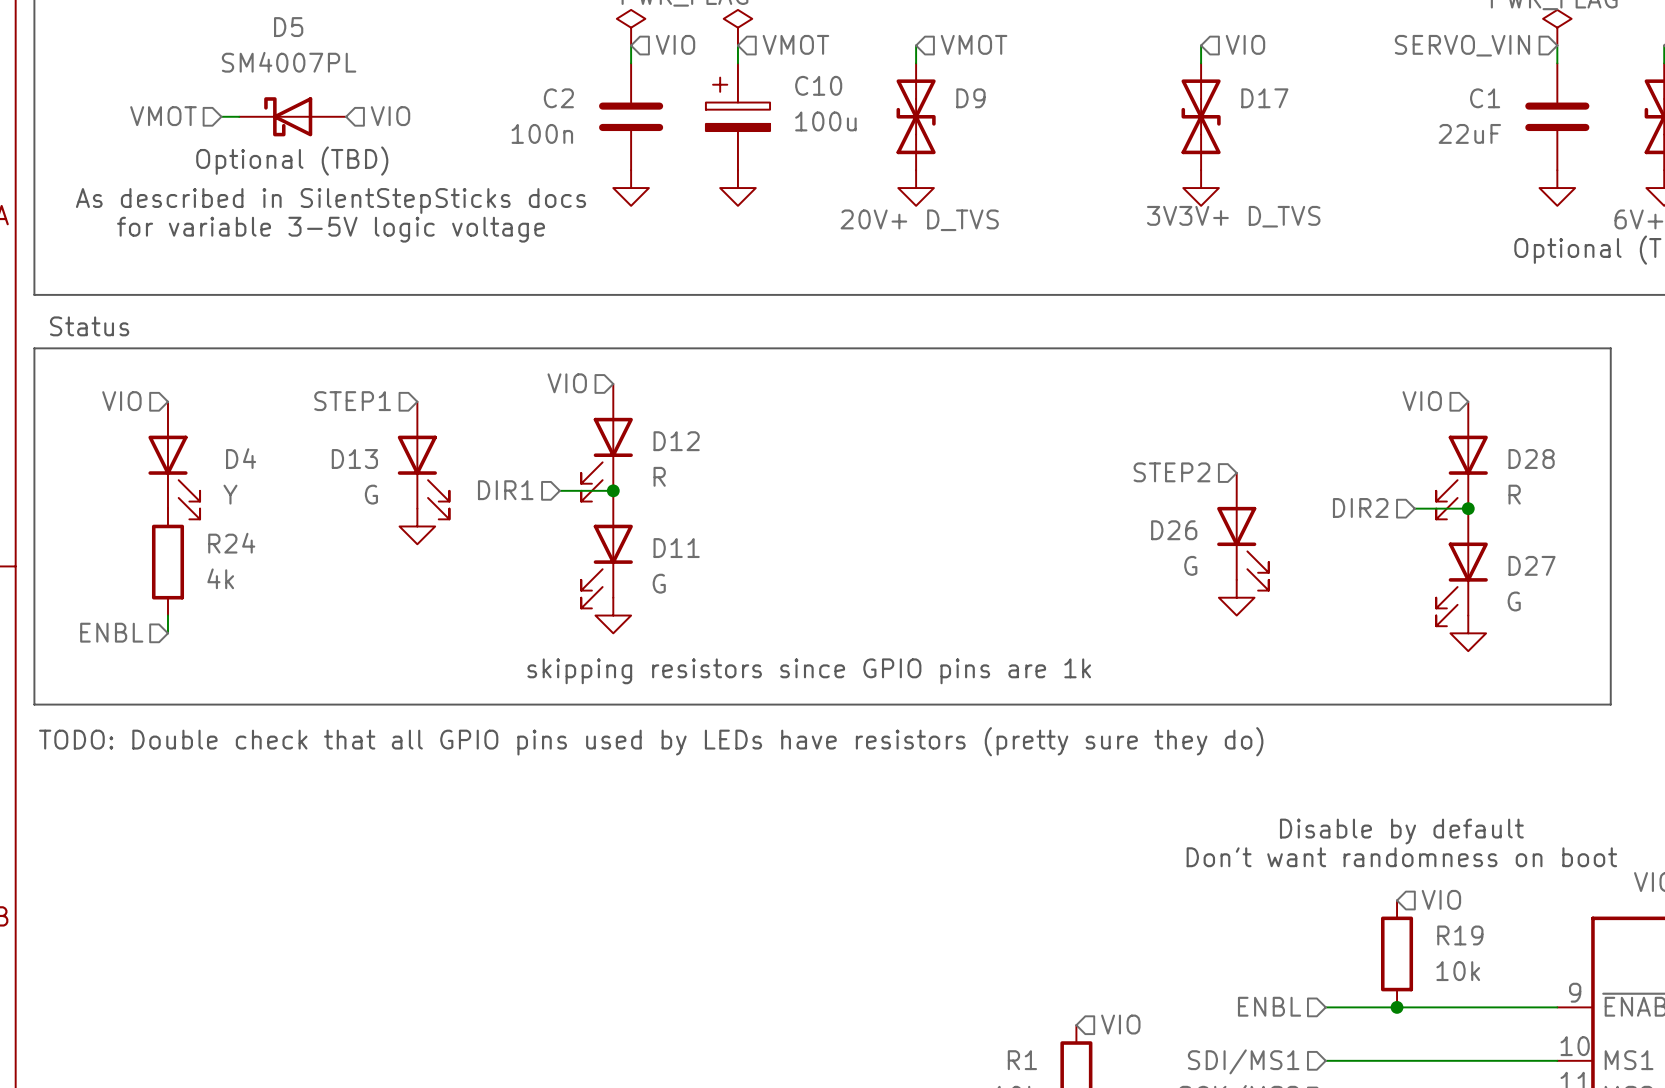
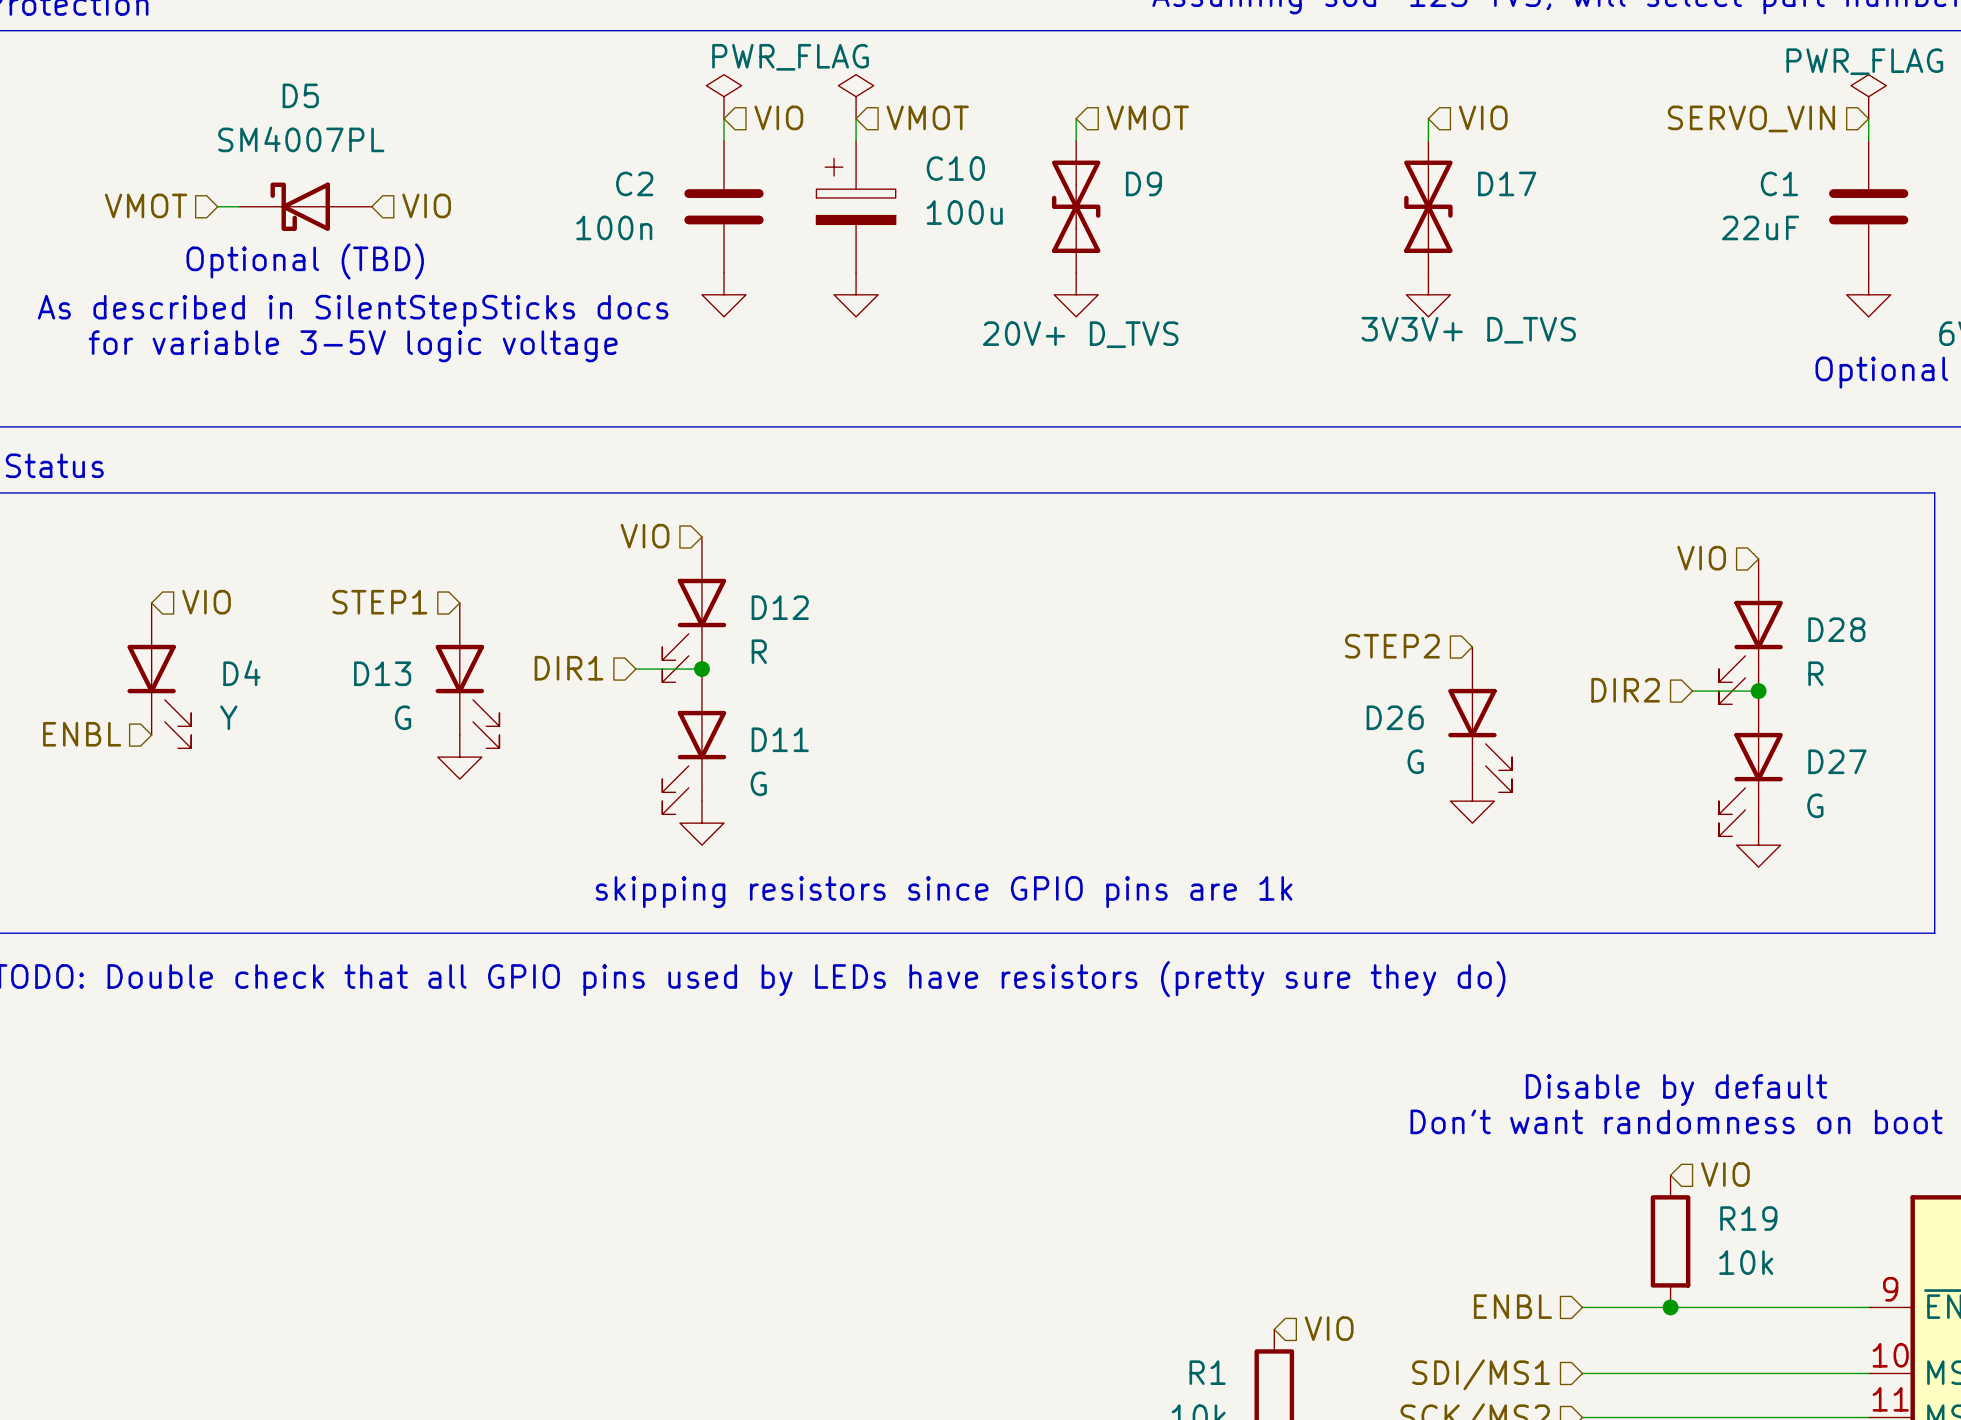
hierarchical label rotation: 0° (121, 401) -> 180° (206, 602)
hierarchical label position: VIO (121, 401) -> VIO (206, 602)
hierarchical label position: STEP1 (352, 401) -> STEP1 (379, 602)
D4 position: (174, 460) -> (159, 675)
D13 position: (423, 460) -> (467, 675)
power symbol position: (417, 526) -> (459, 757)
R24: 4k (167, 562) -> none
wire: (167, 615) (167, 633) -> none
hierarchical label position: ENBL (111, 632) -> ENBL (82, 734)

